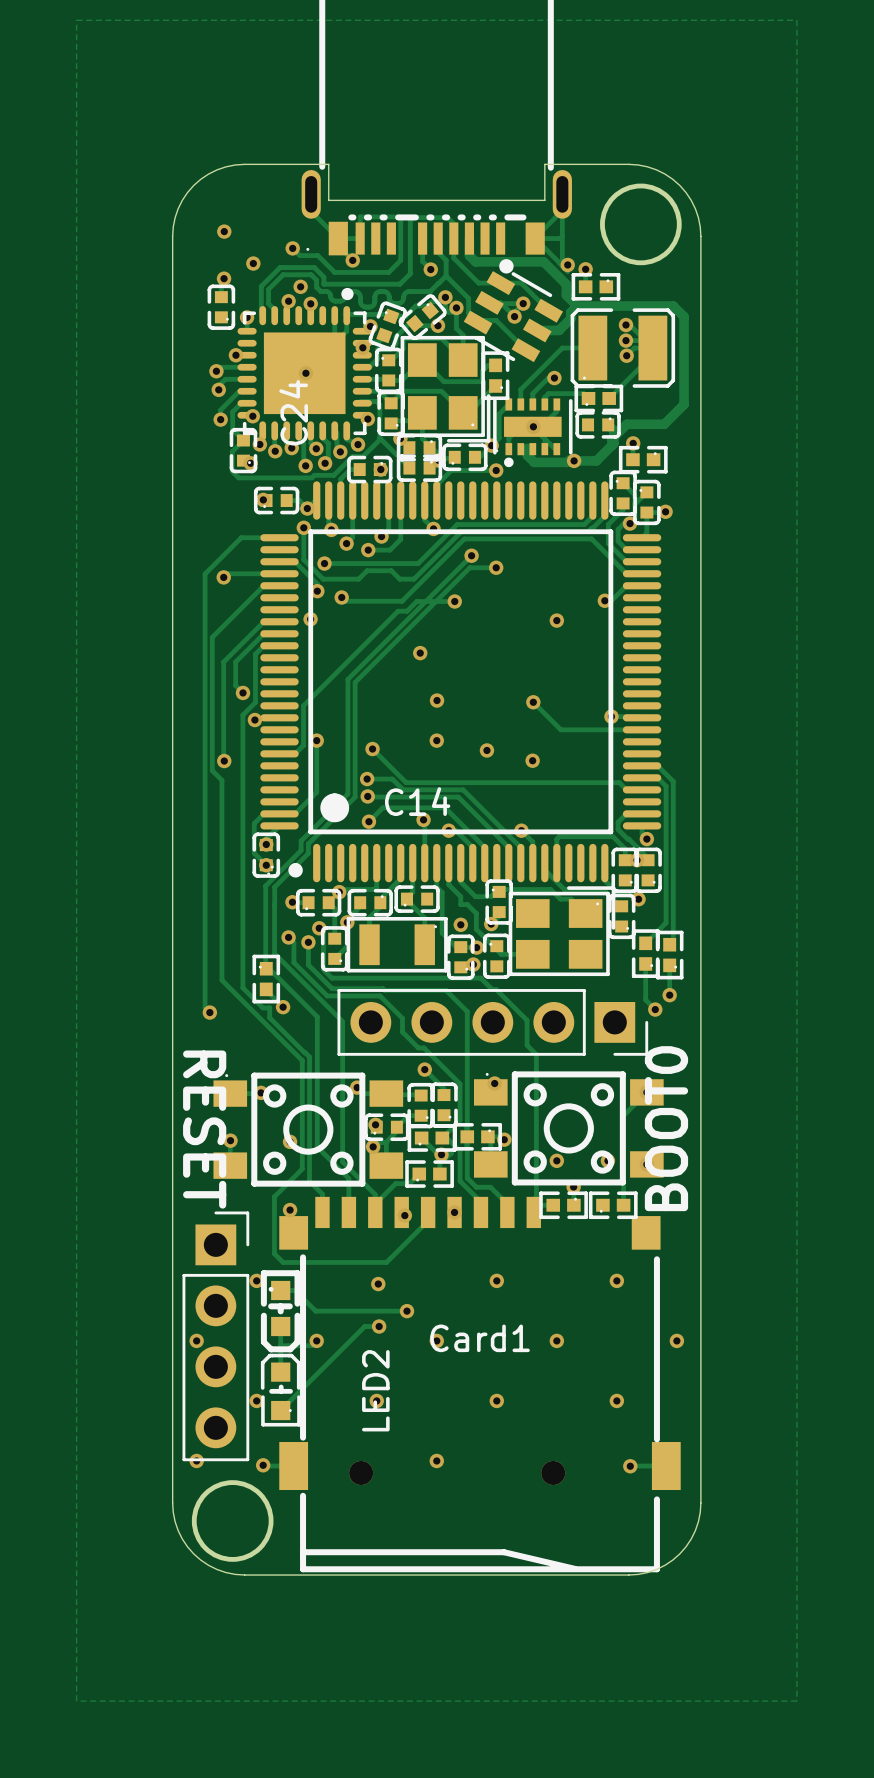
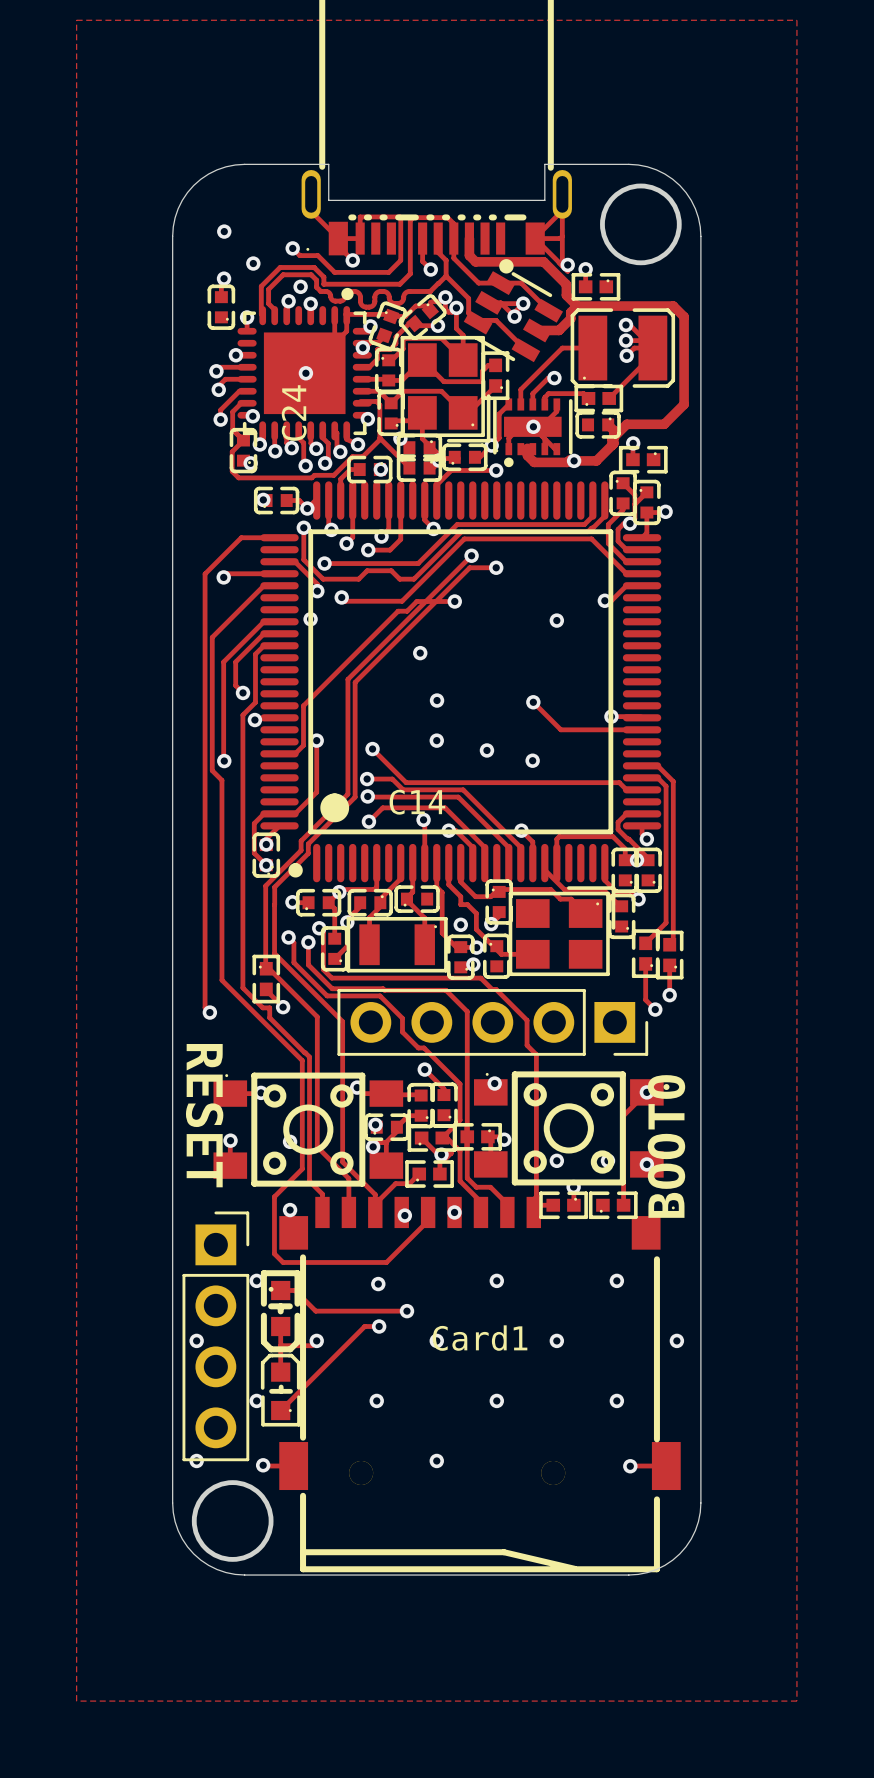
LED2 name: LED2 (375, 1390) -> none

